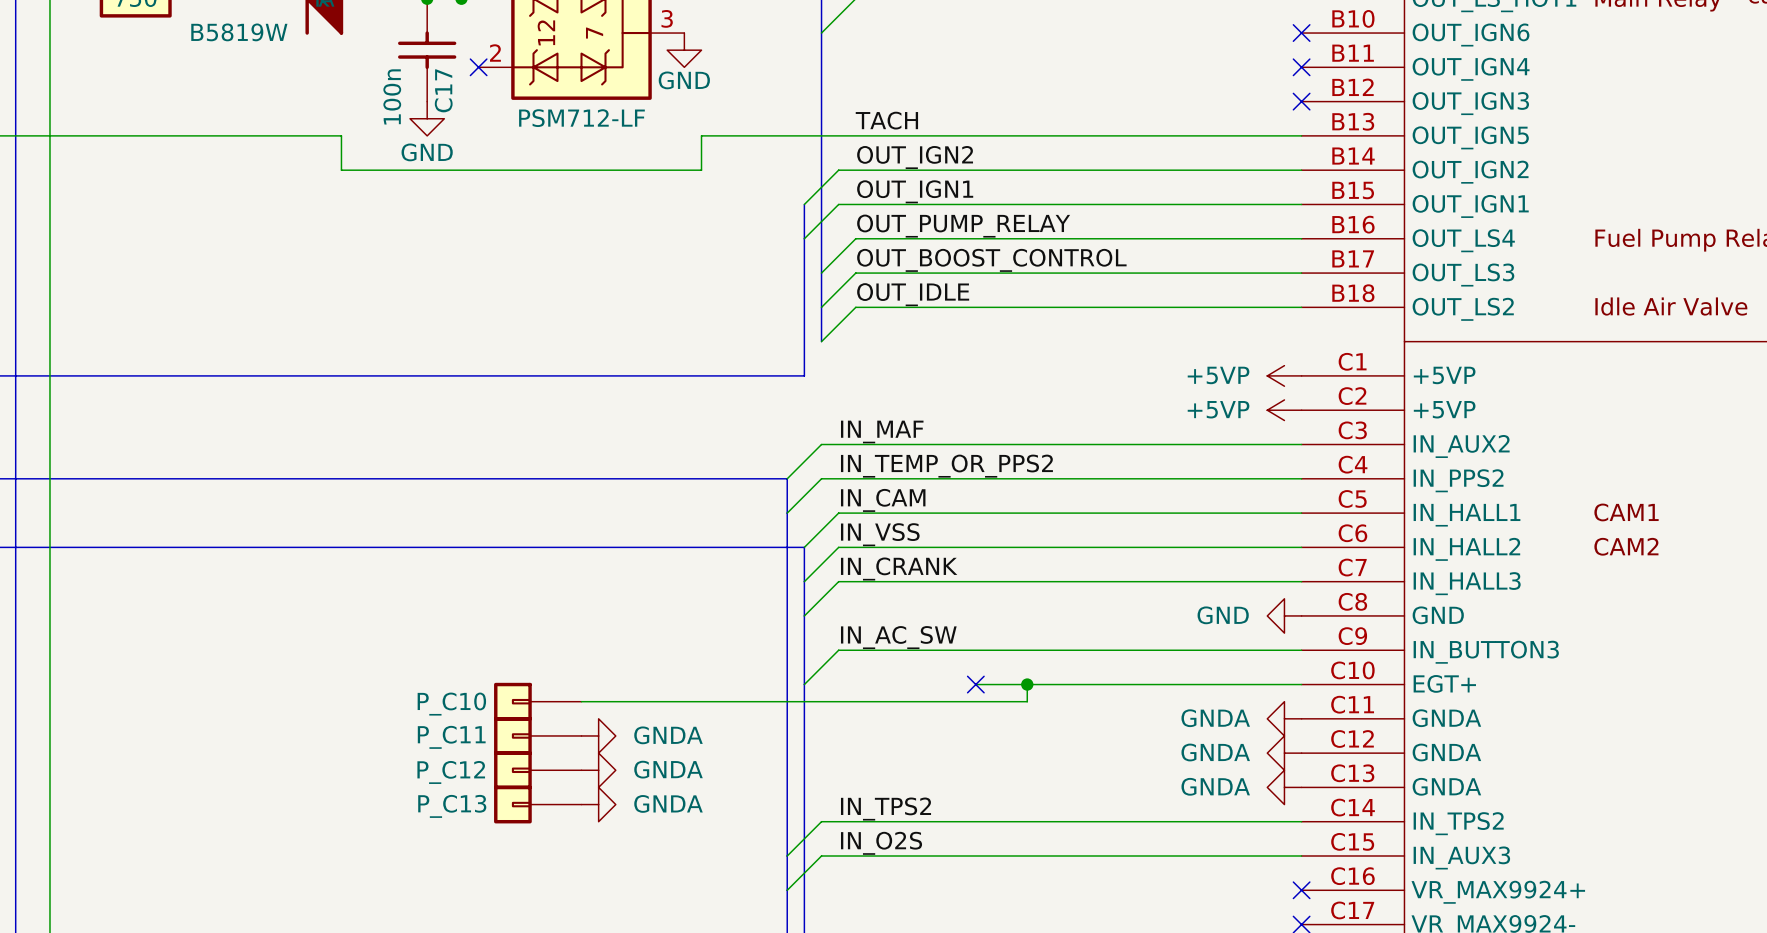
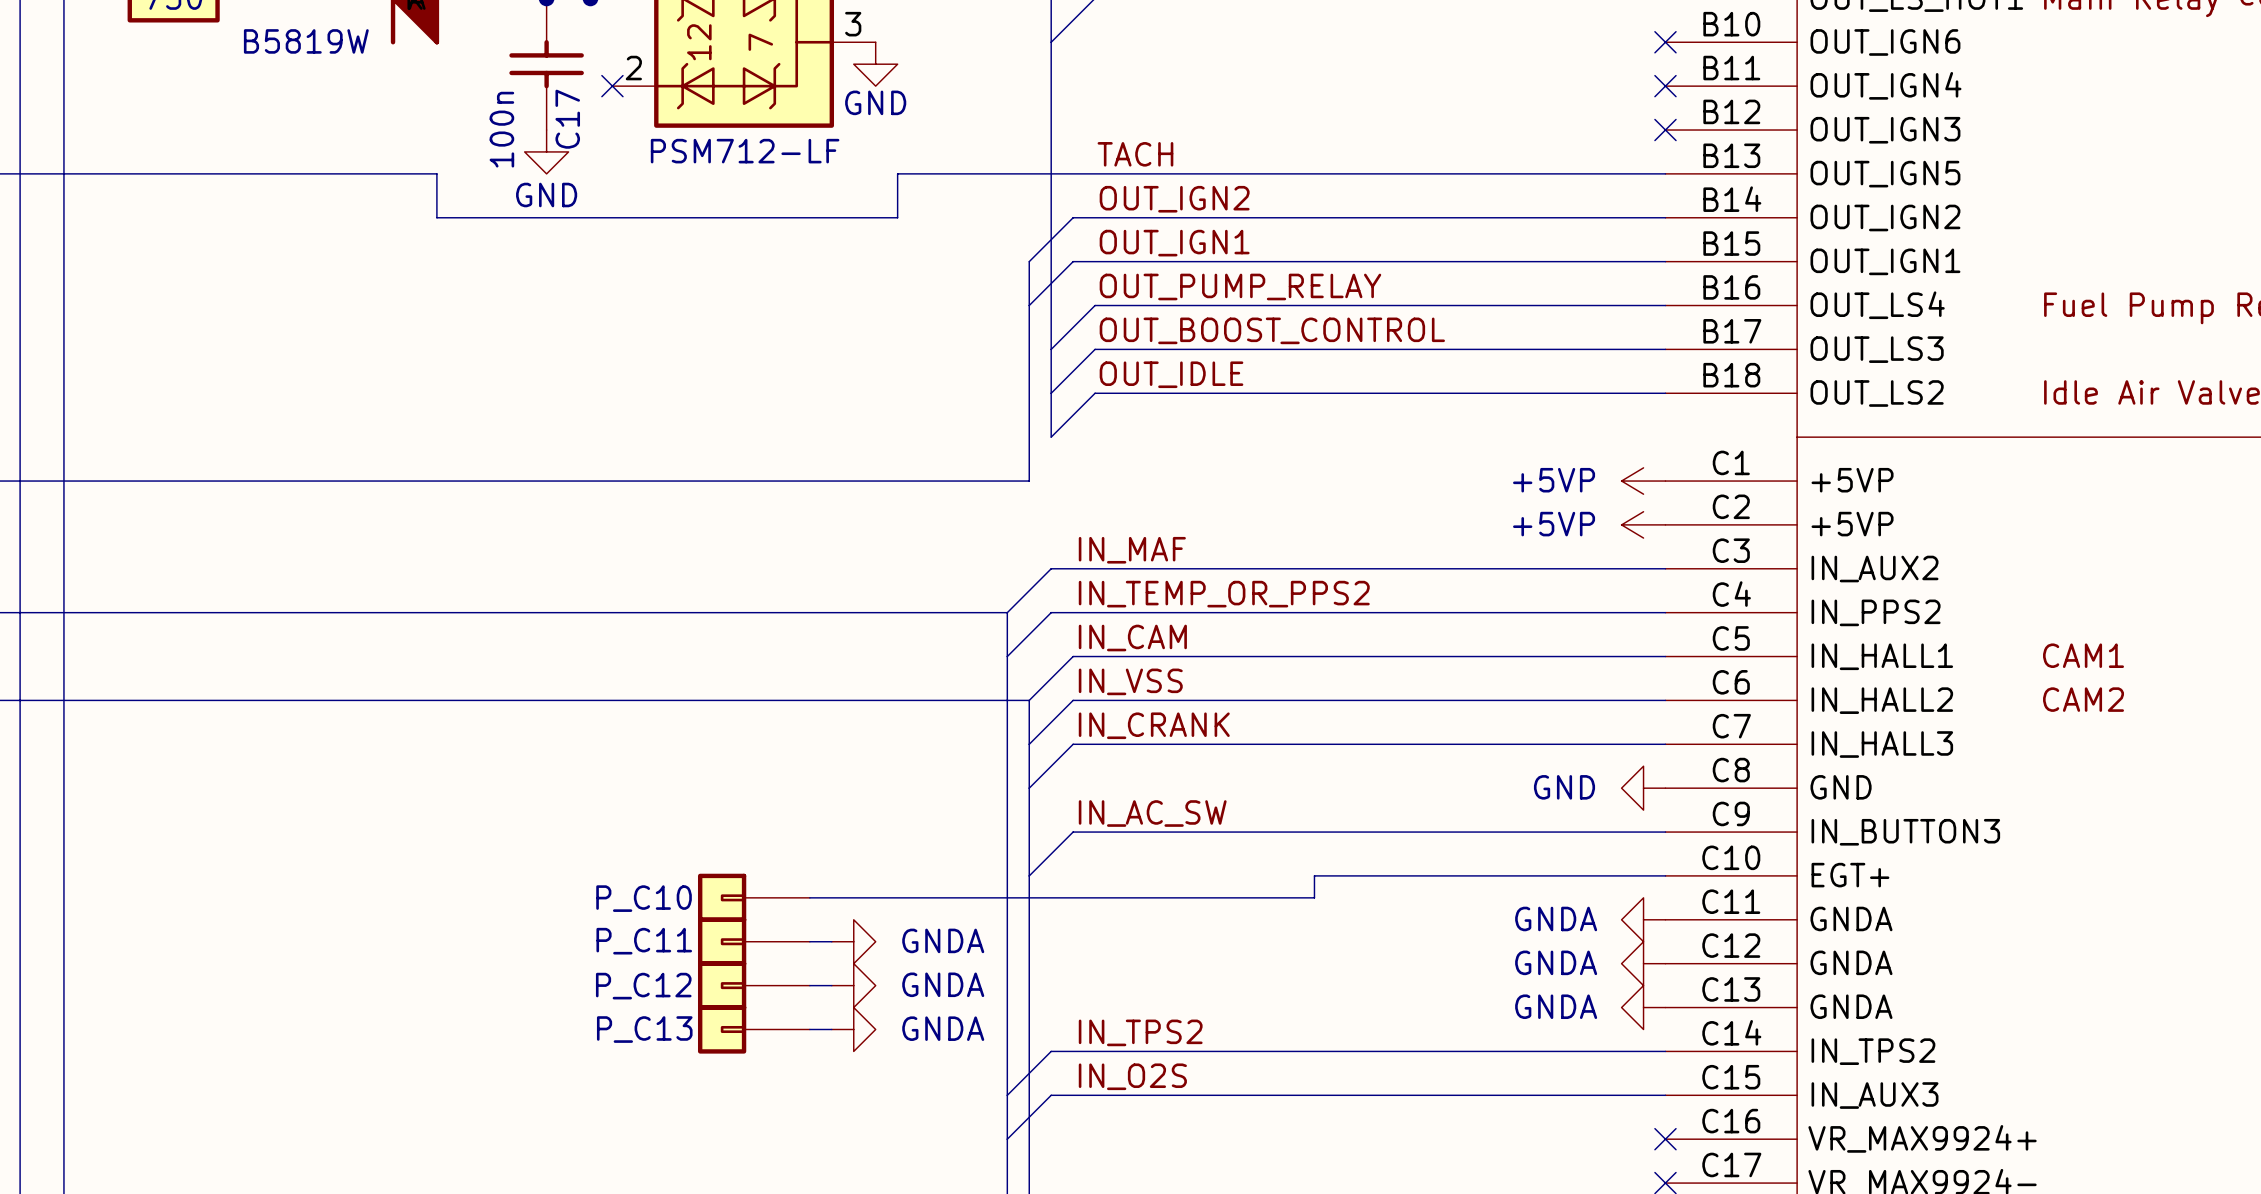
wire: (975, 684) (1027, 684) -> none
no-connect mark: (975, 684) -> none
junction: (1027, 684) -> none
P_C10 position: (537, 701) -> (753, 897)
P_C11 position: (537, 735) -> (753, 941)
power symbol: GNDA (598, 735) -> none
wire: none -> (809, 941) (831, 941)
power symbol: none -> GNDA (853, 941)
P_C12 position: (537, 770) -> (753, 985)
power symbol: GNDA (598, 770) -> none
wire: none -> (809, 985) (831, 985)
power symbol: none -> GNDA (853, 985)
P_C13 position: (537, 804) -> (753, 1029)
power symbol: GNDA (598, 804) -> none
wire: none -> (809, 1029) (831, 1029)
power symbol: none -> GNDA (853, 1029)

